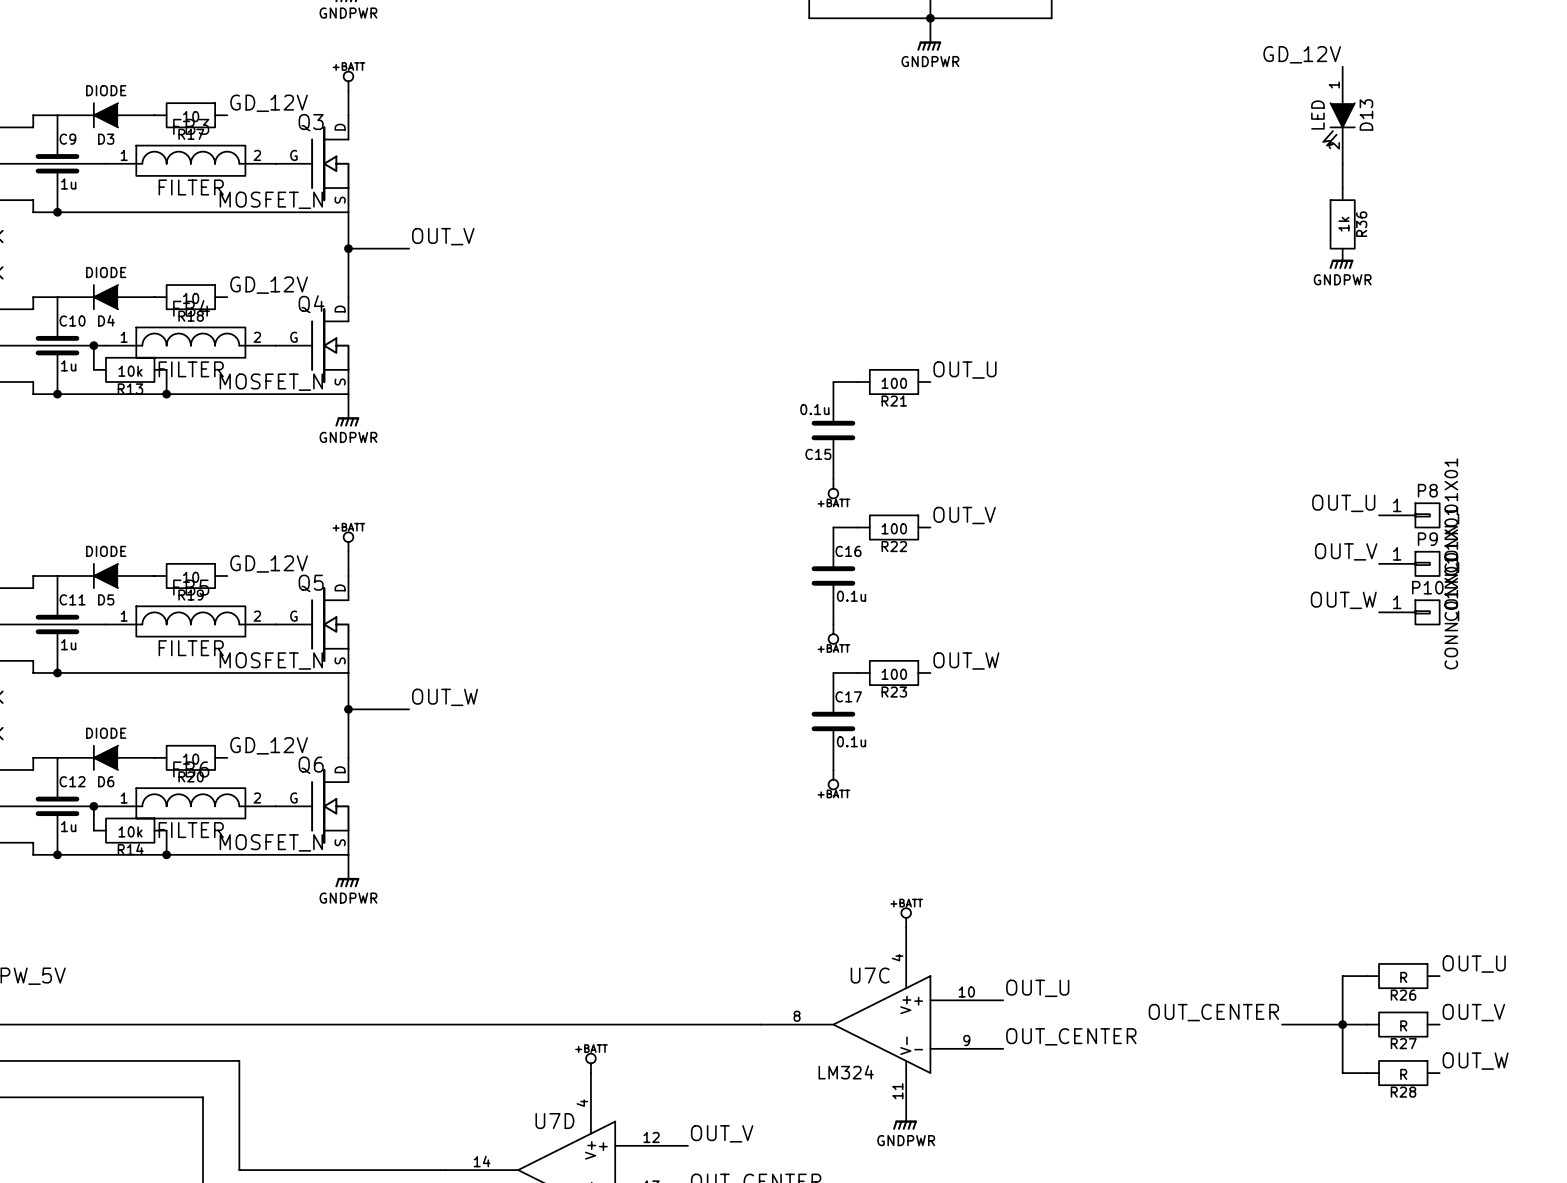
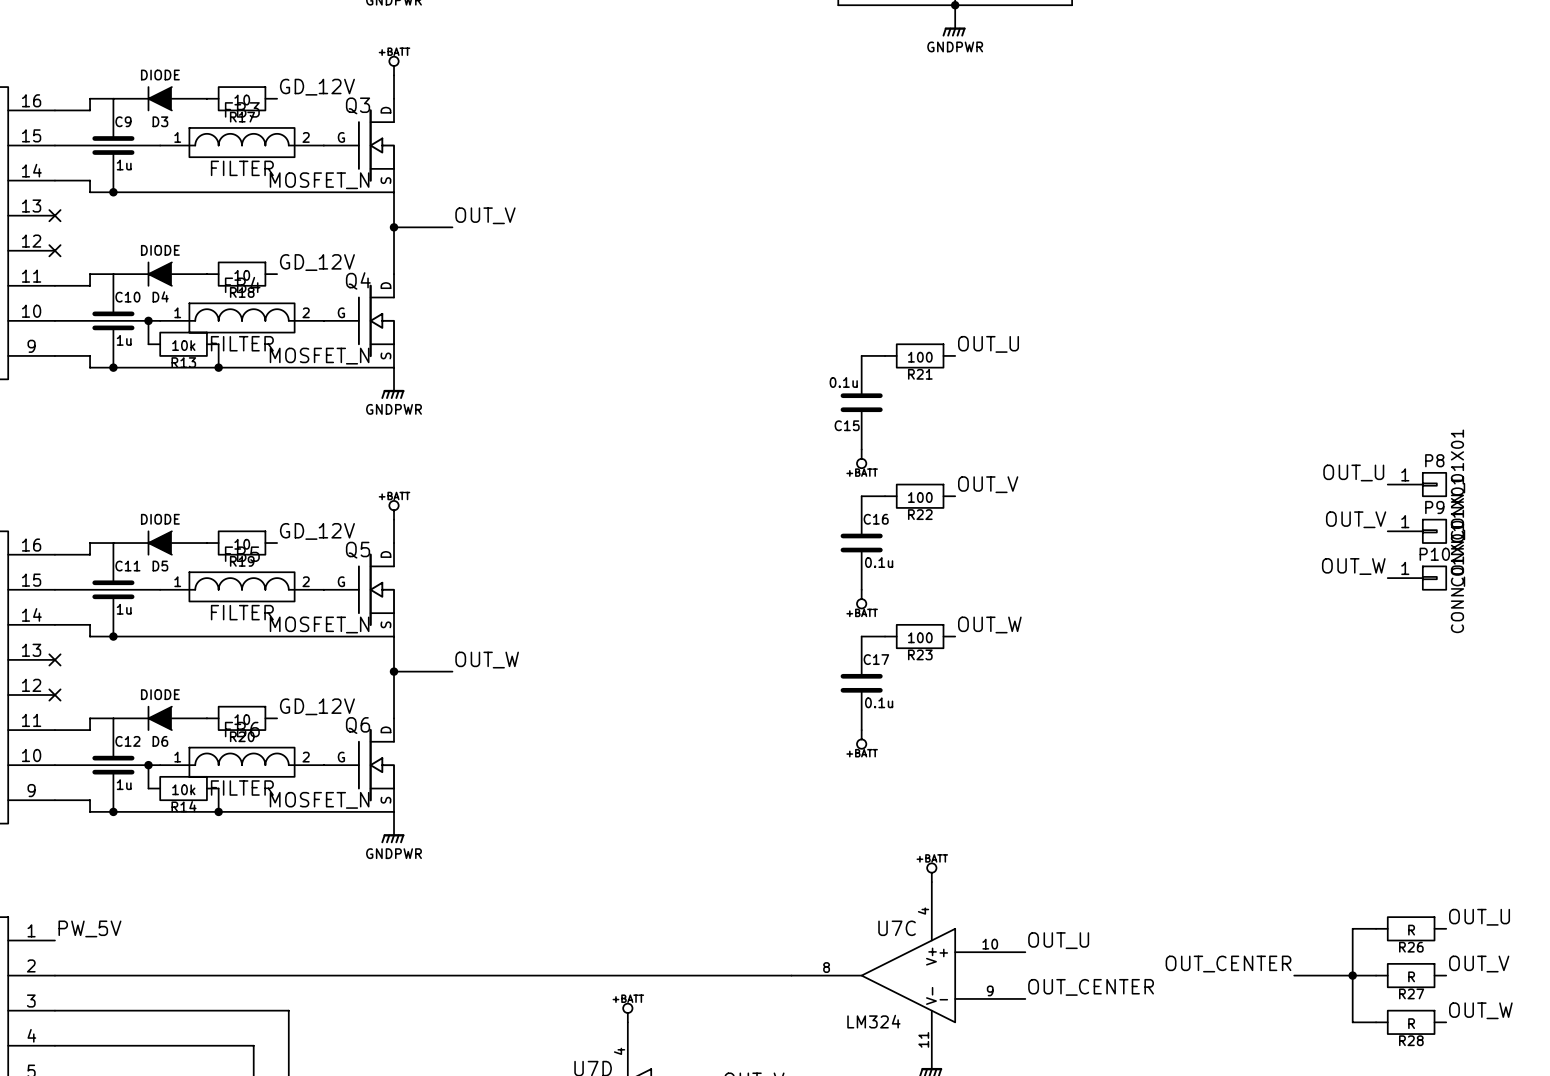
label: GD_12V (1302, 54) -> none
D13: LED (1339, 115) -> none
wire: (1342, 163) (1342, 188) -> none
R36: 1k (1342, 224) -> none
power symbol: GNDPWR (1341, 264) -> none

